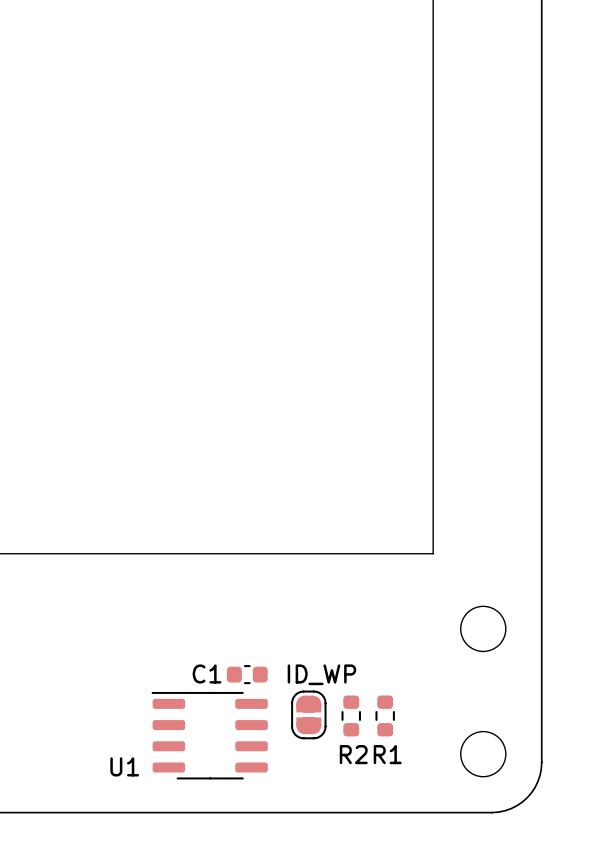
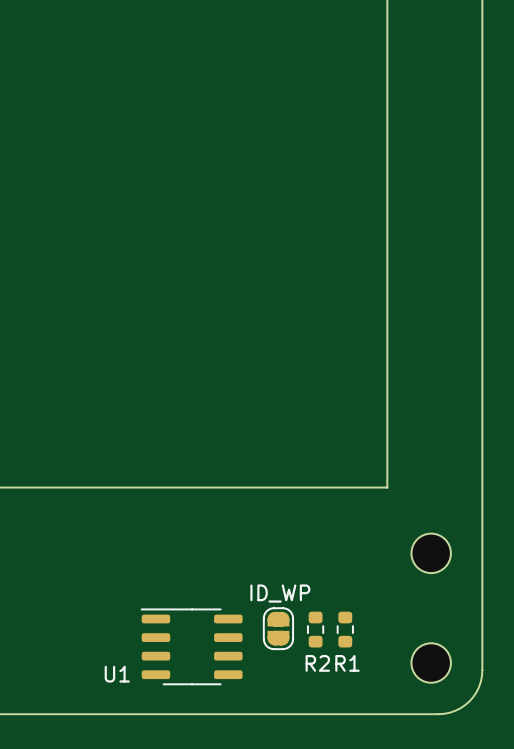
C1: (247, 674) -> none
text: none -> ID_WP (280, 593)
part value: ID_WP (321, 674) -> none

